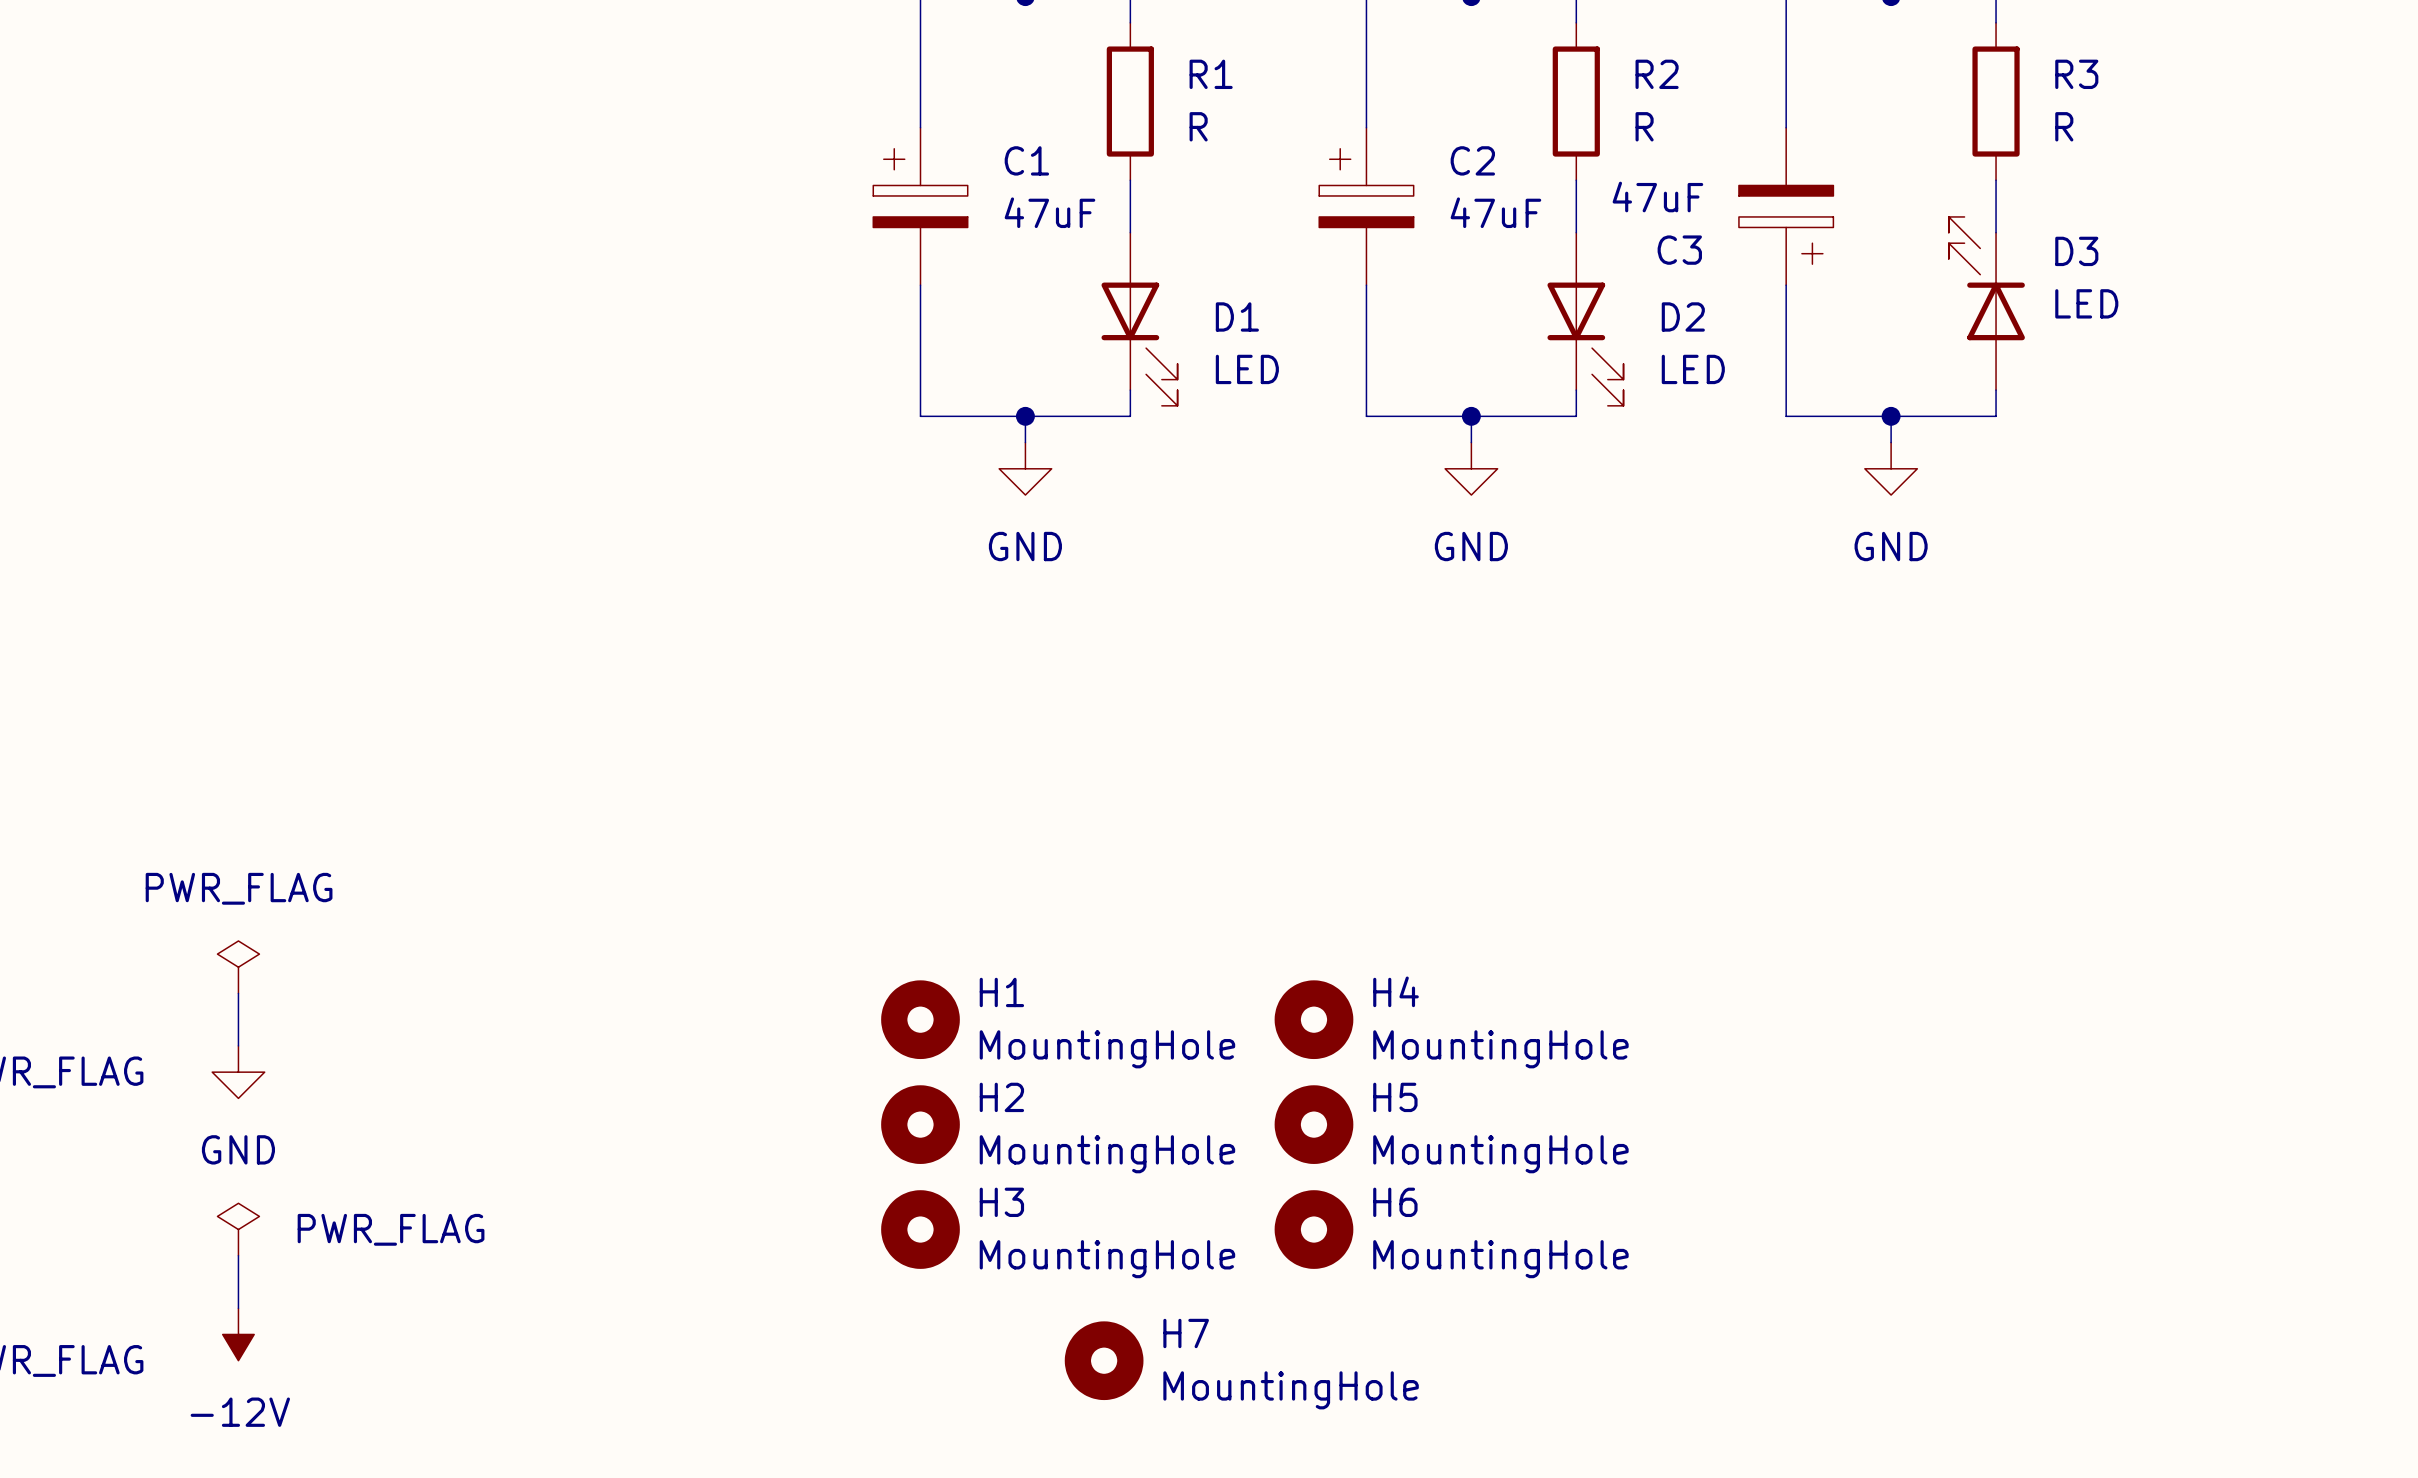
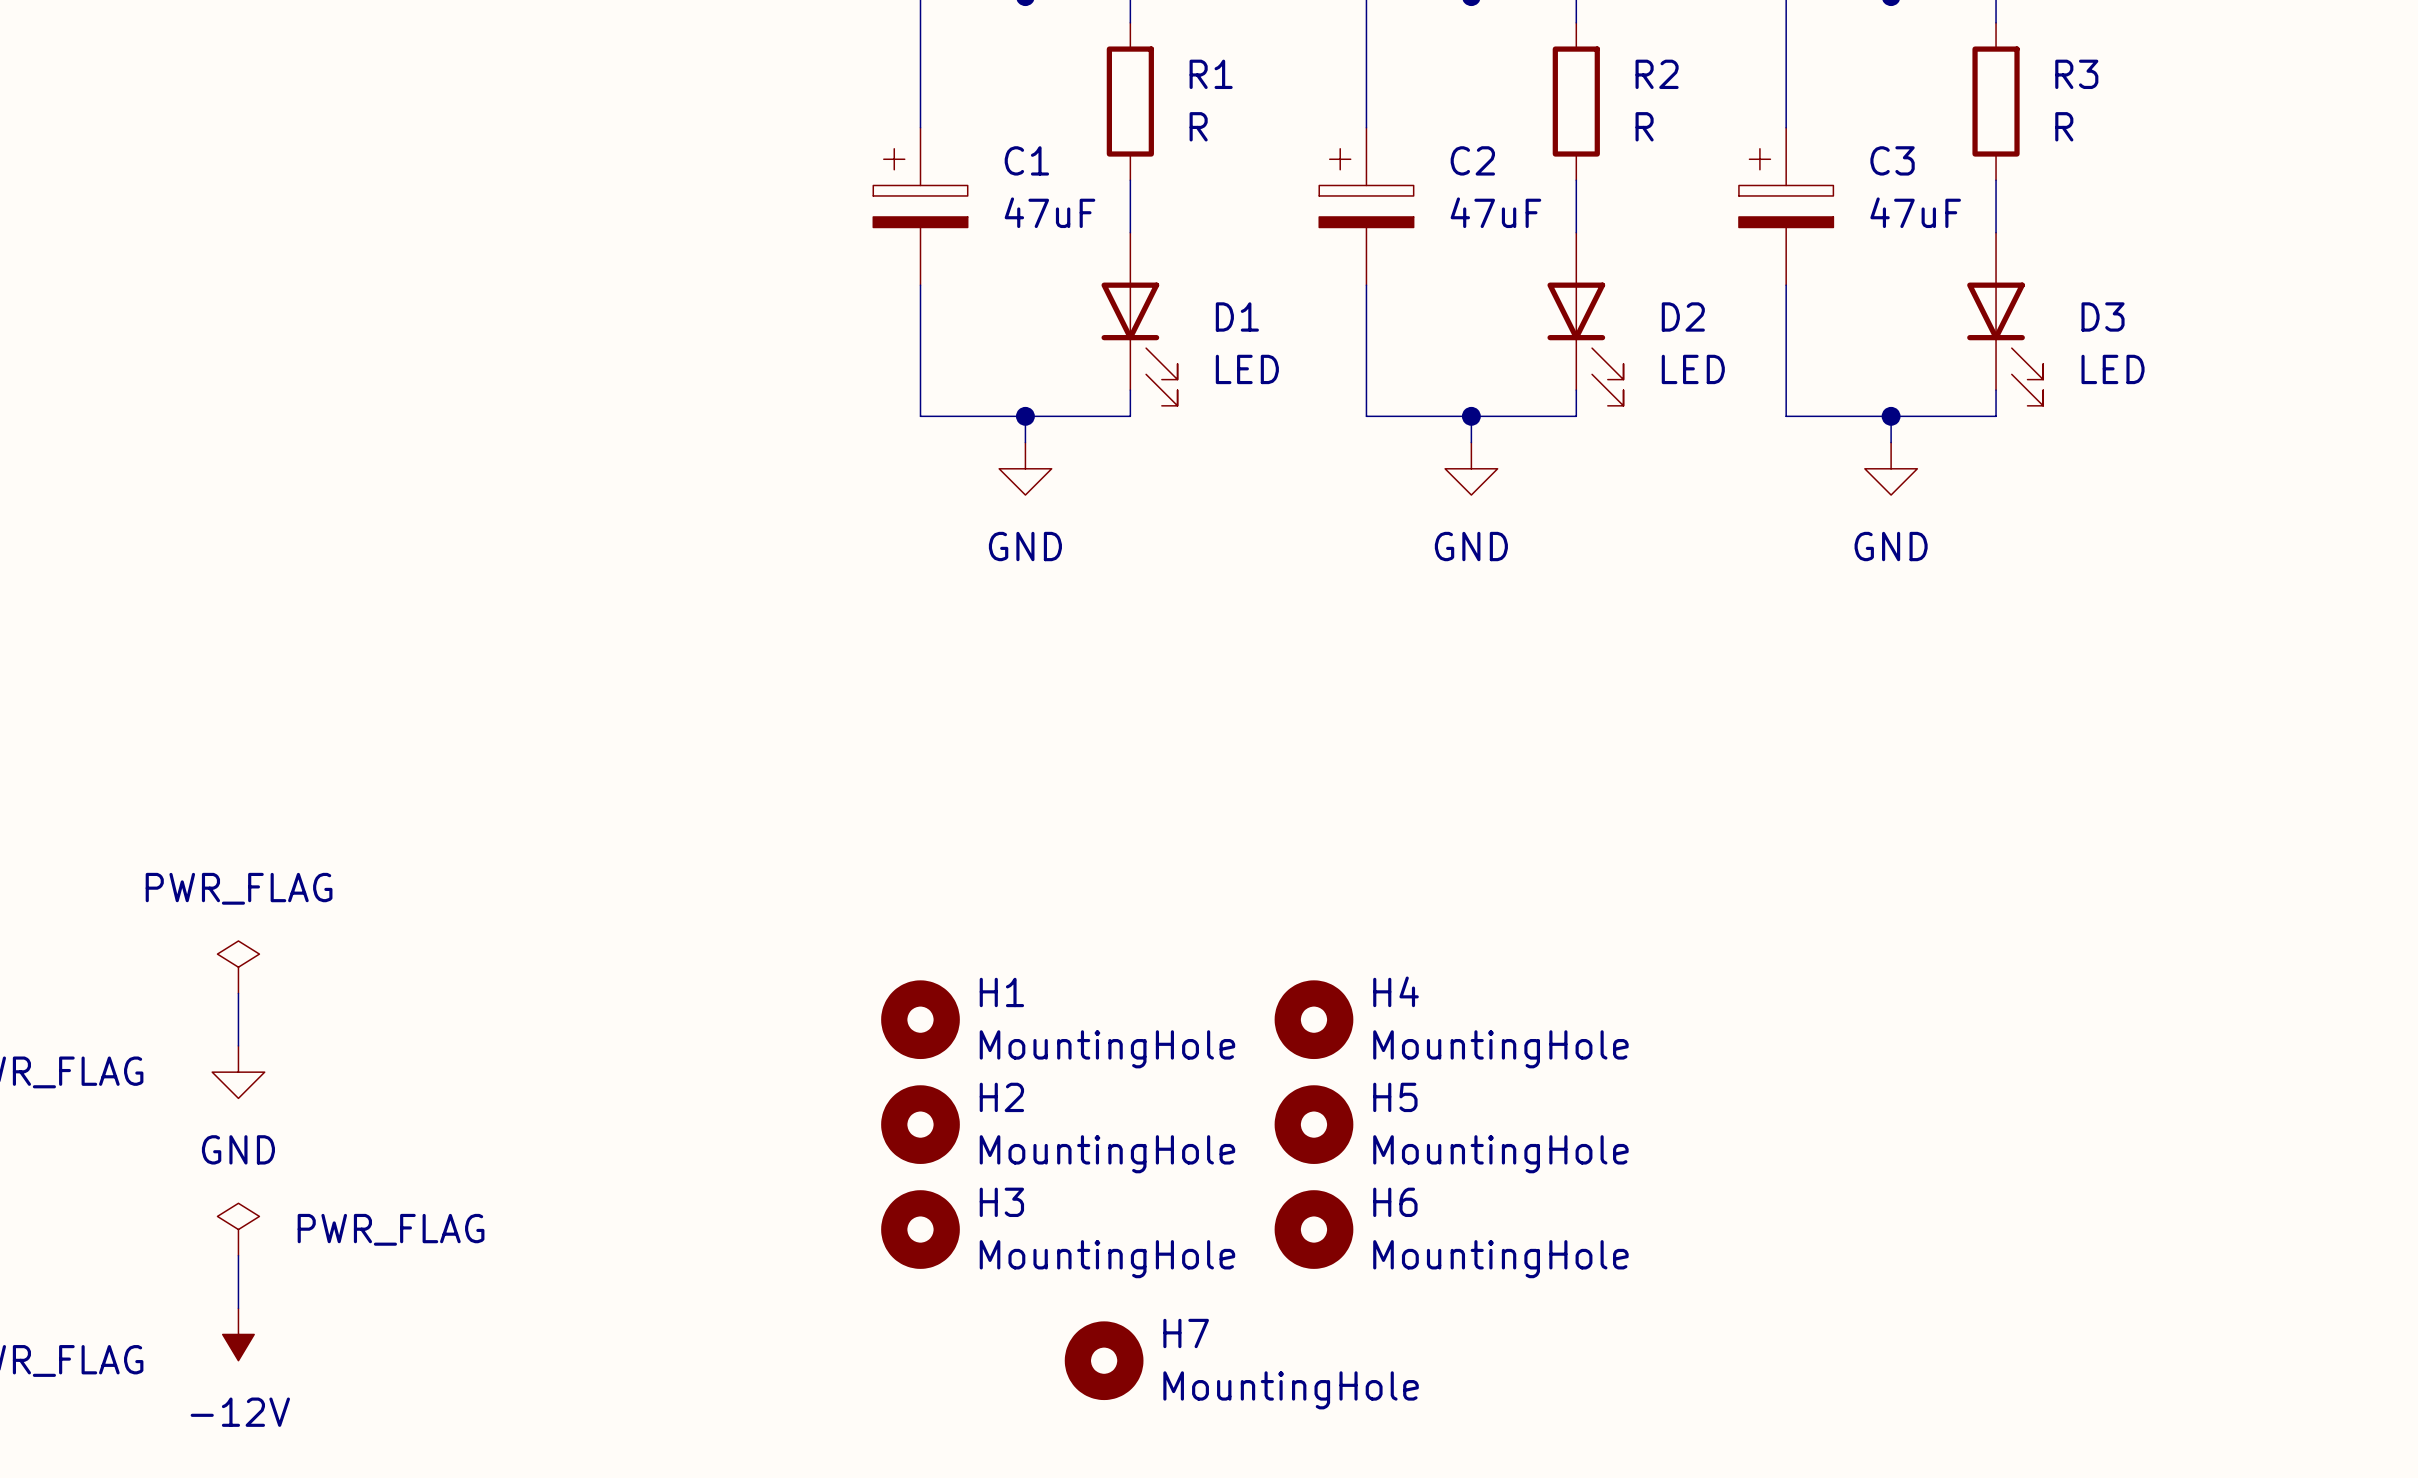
C3 rotation: 0° (1786, 224) -> 180° (1786, 188)
D3 name position: D3 (2076, 251) -> D3 (2103, 316)
D3 rotation: 0° (1986, 278) -> 180° (2005, 344)
D3 value position: LED (2086, 303) -> LED (2113, 369)

